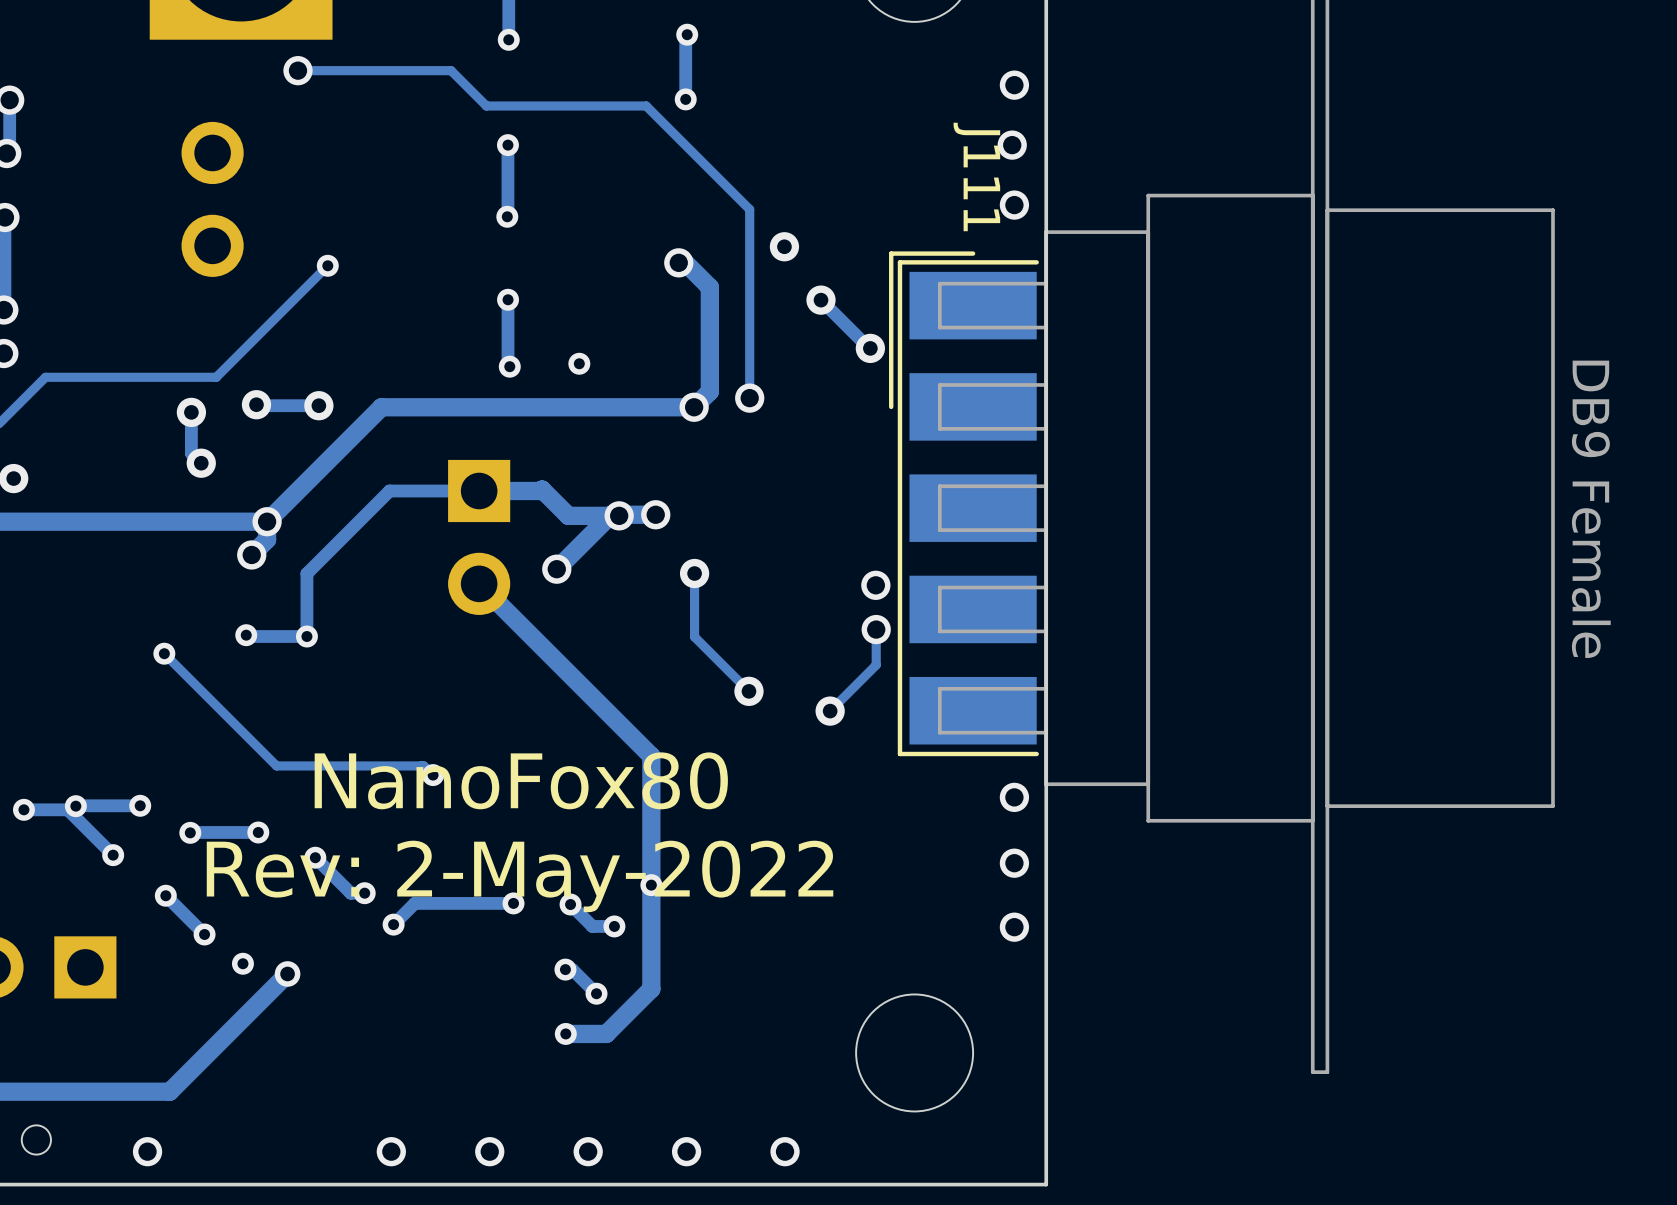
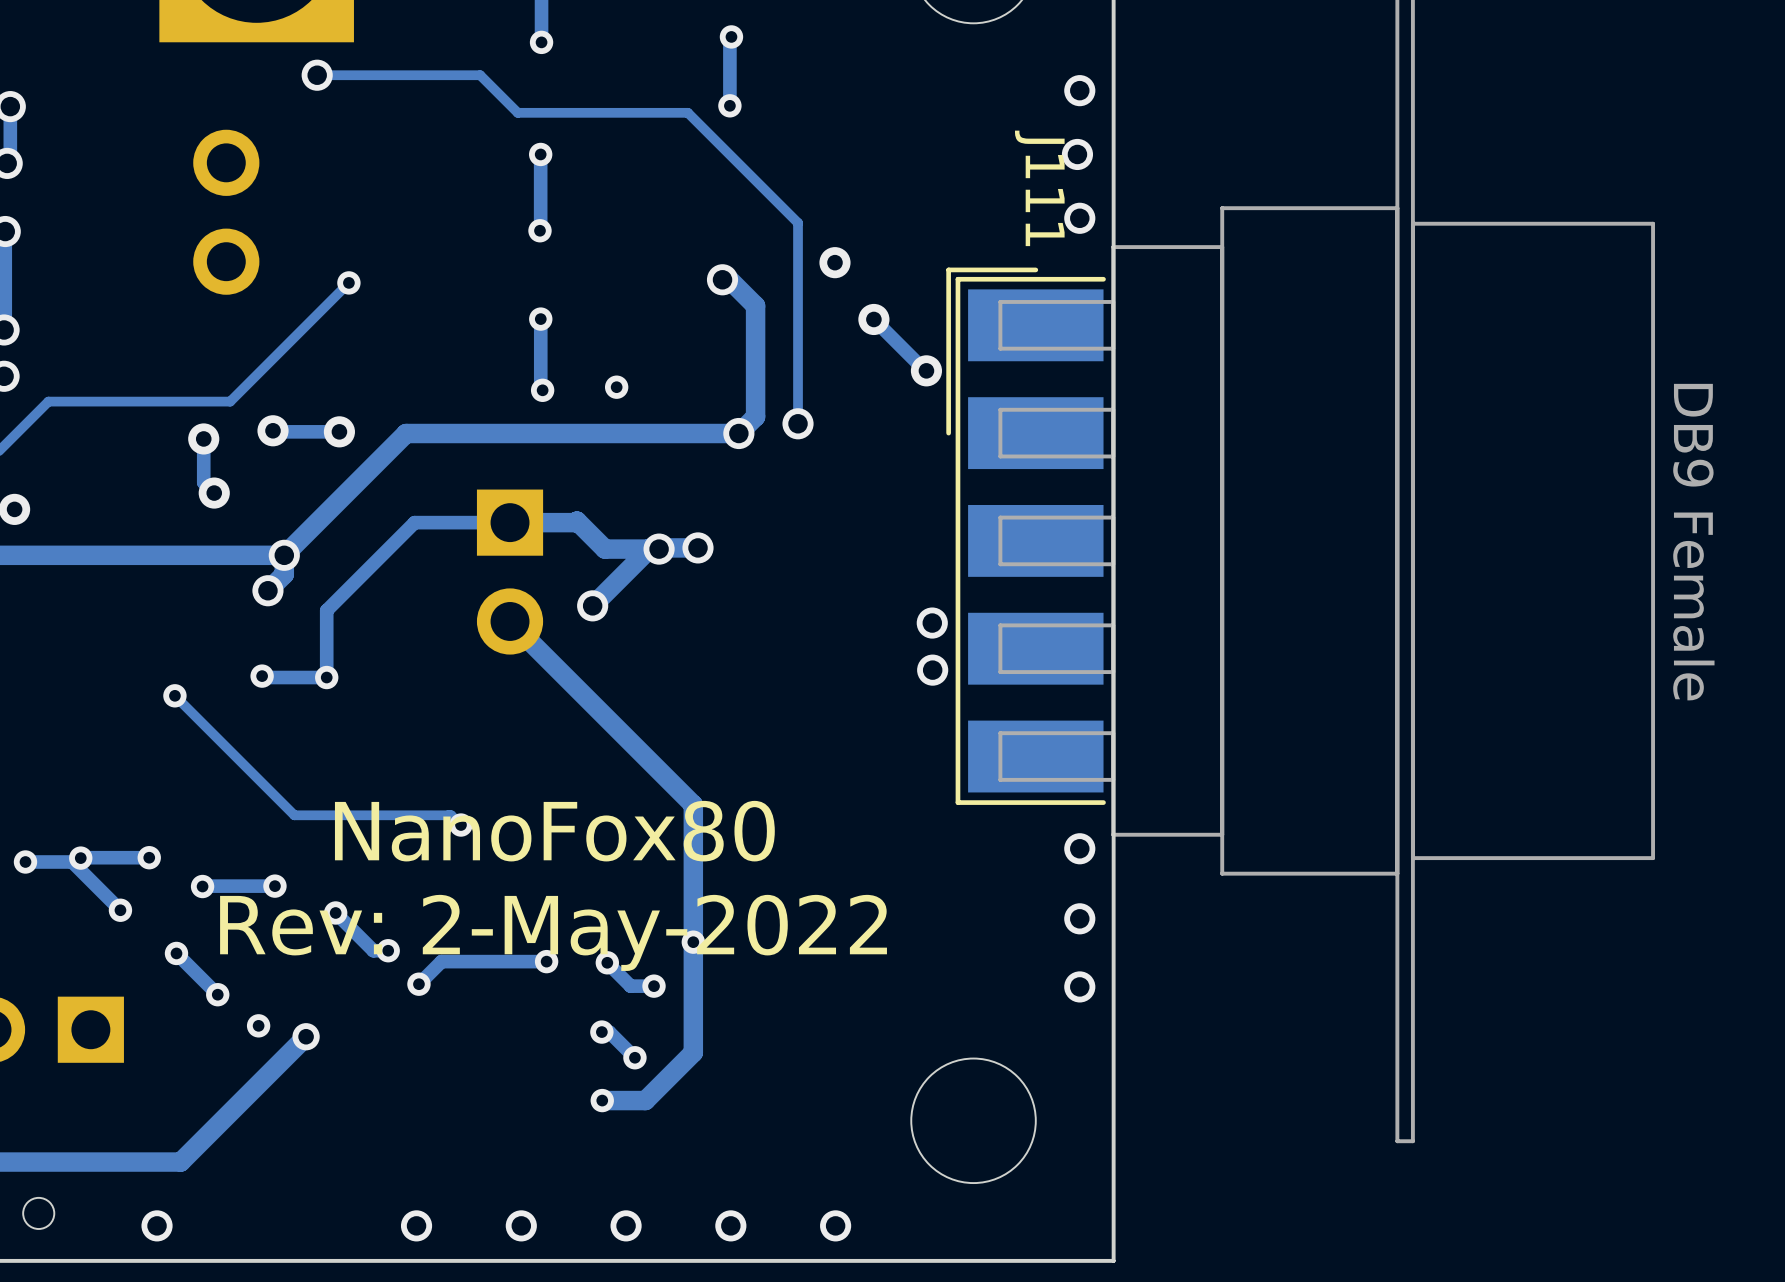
track: (694, 573) (694, 636) (748, 691) -> none
via: (694, 573) -> none
track: (876, 629) (876, 665) (830, 711) -> none
via: (748, 691) -> none
via: (830, 711) -> none

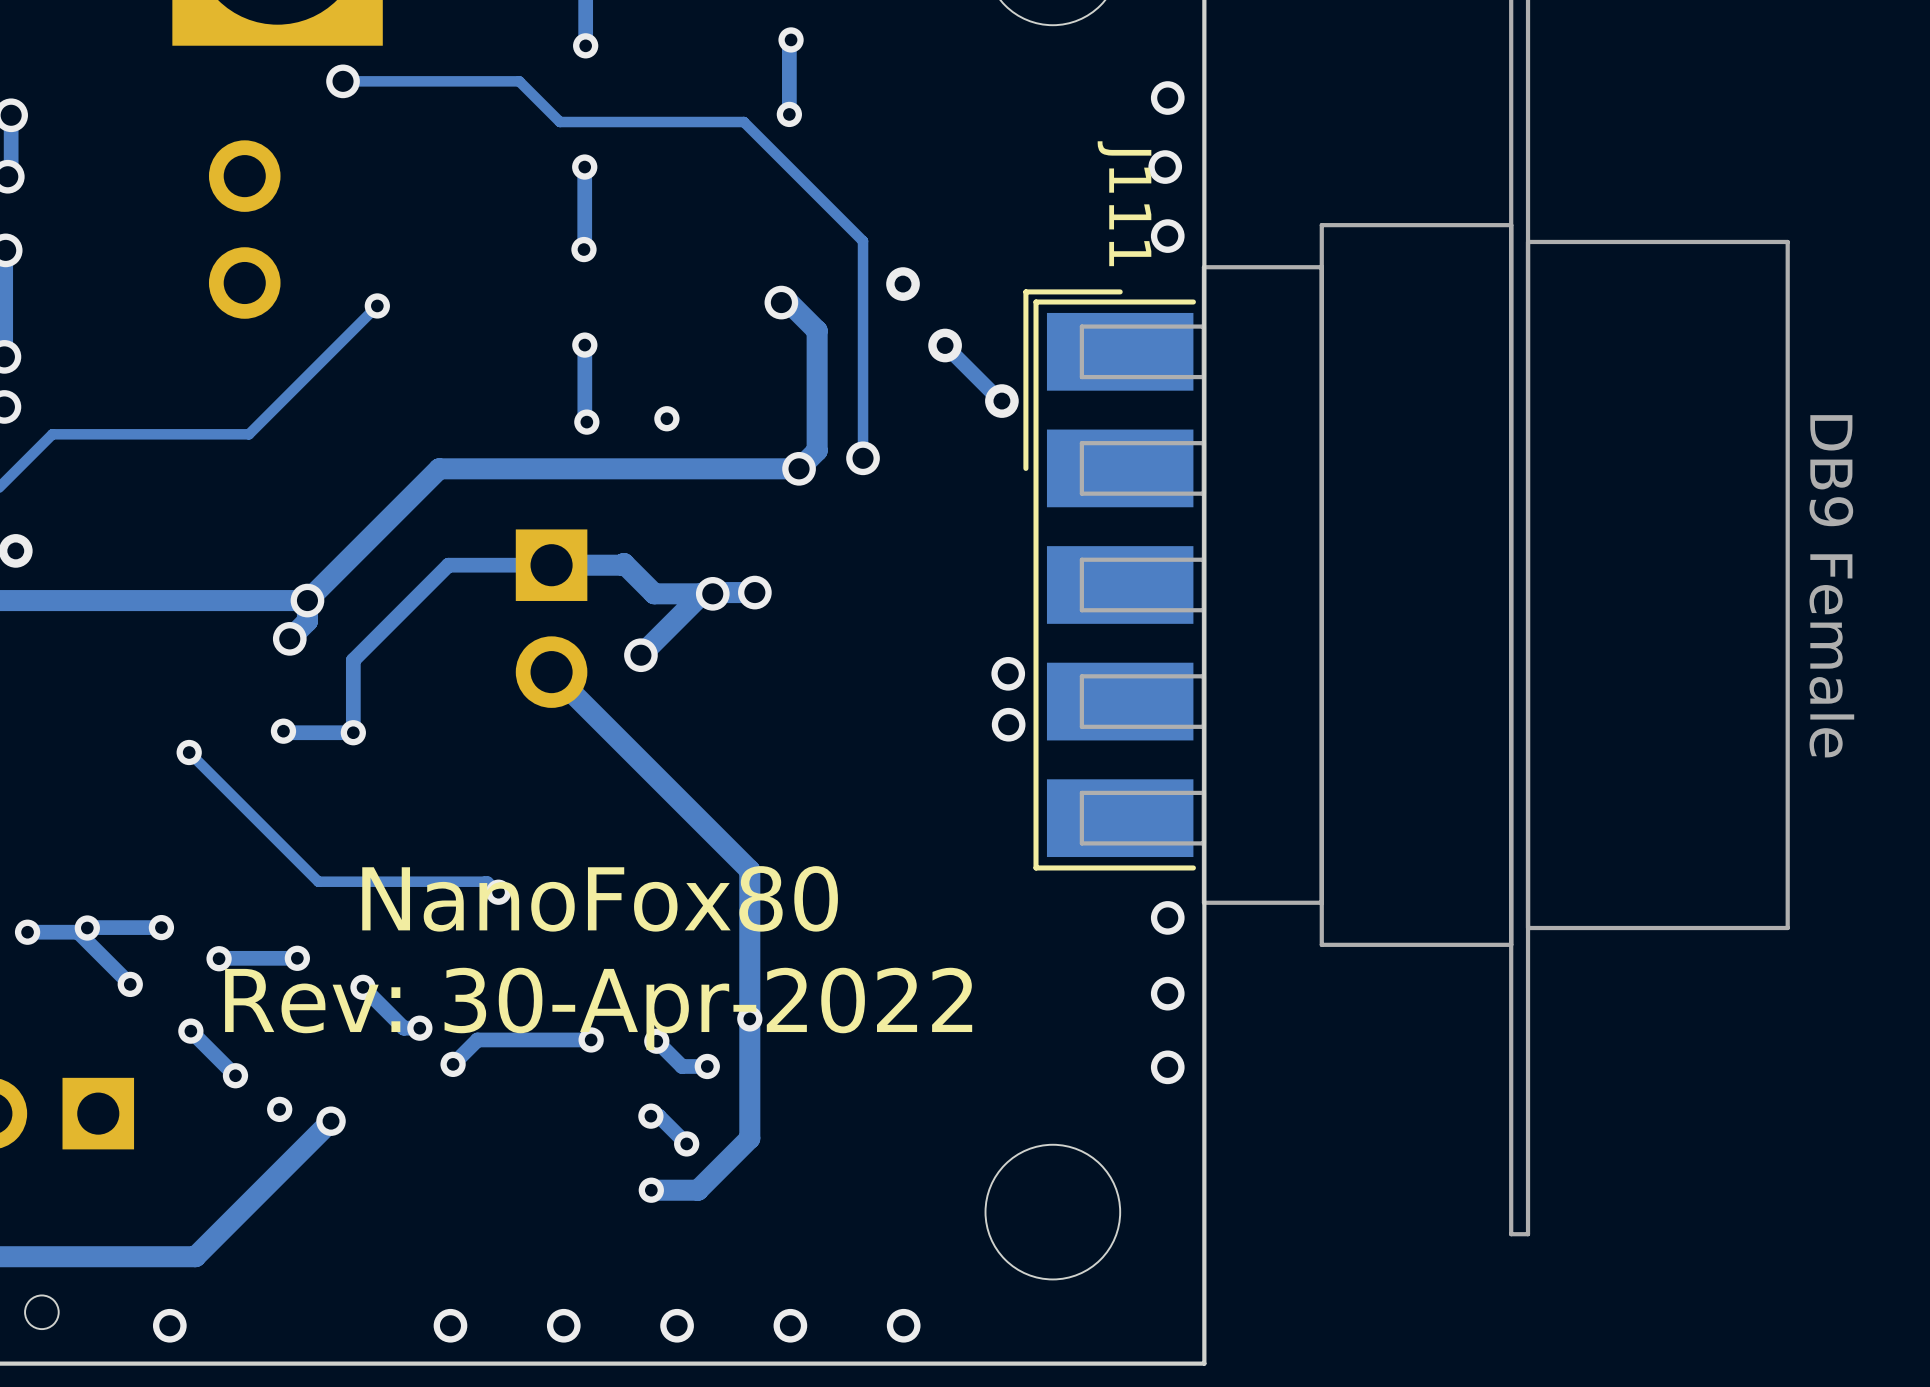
track: (273, 430) (339, 431) -> none
via: (273, 430) -> none
via: (339, 431) -> none
track: (203, 438) (203, 482) (214, 493) -> none
via: (203, 438) -> none
via: (214, 493) -> none
text: Rev: 2-May-2022 (553, 932) -> Rev: 30-Apr-2022 (598, 1008)

